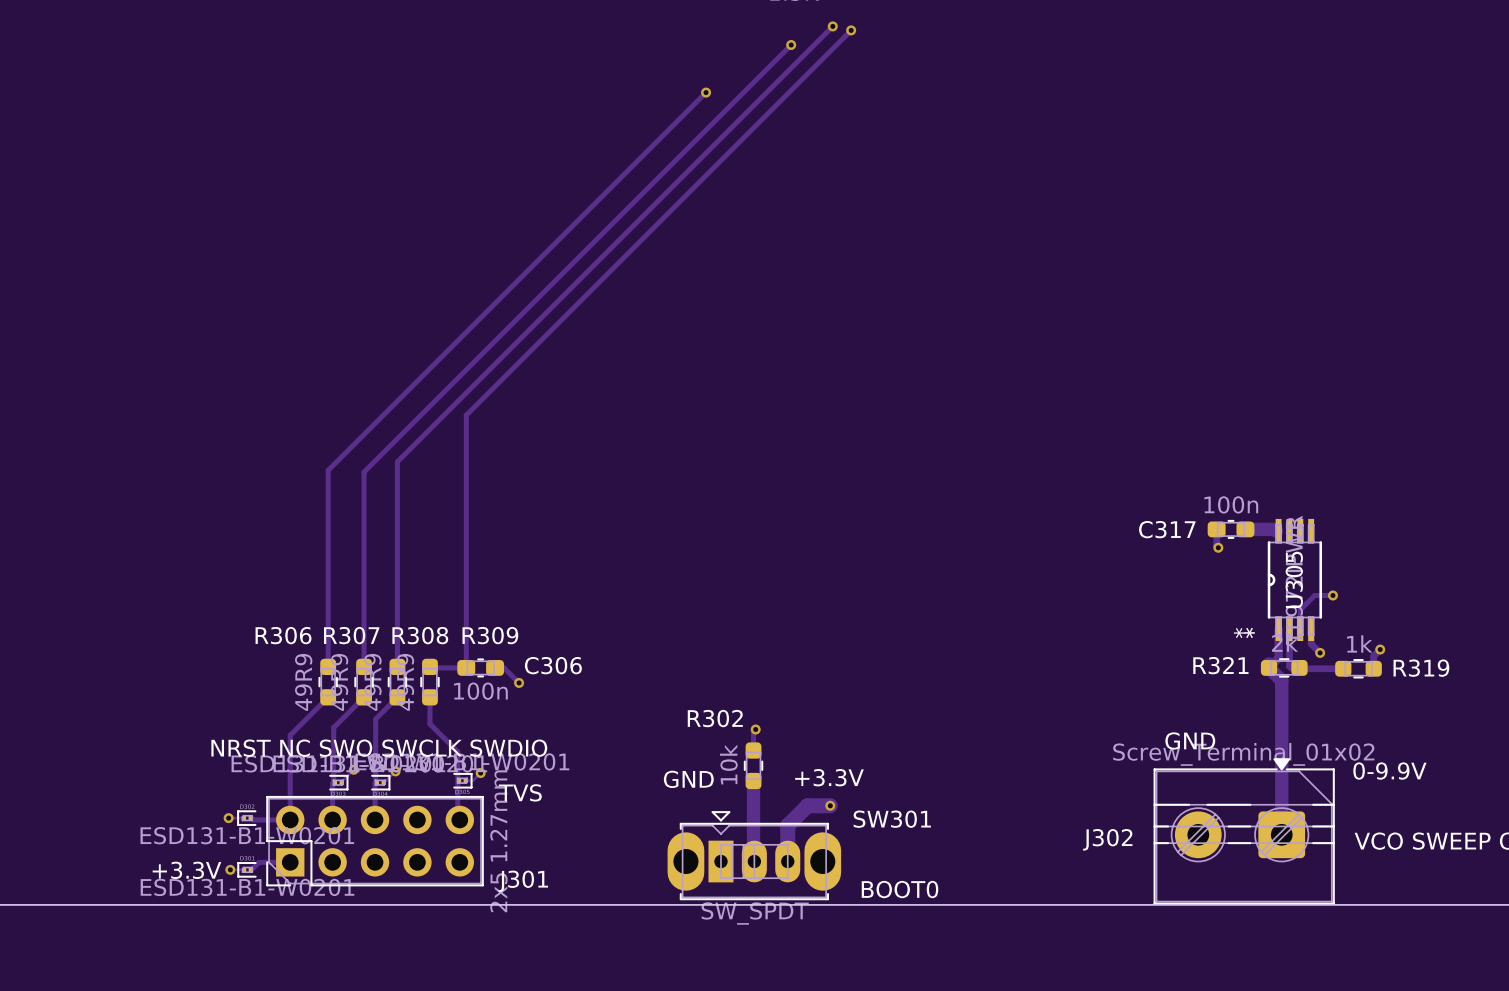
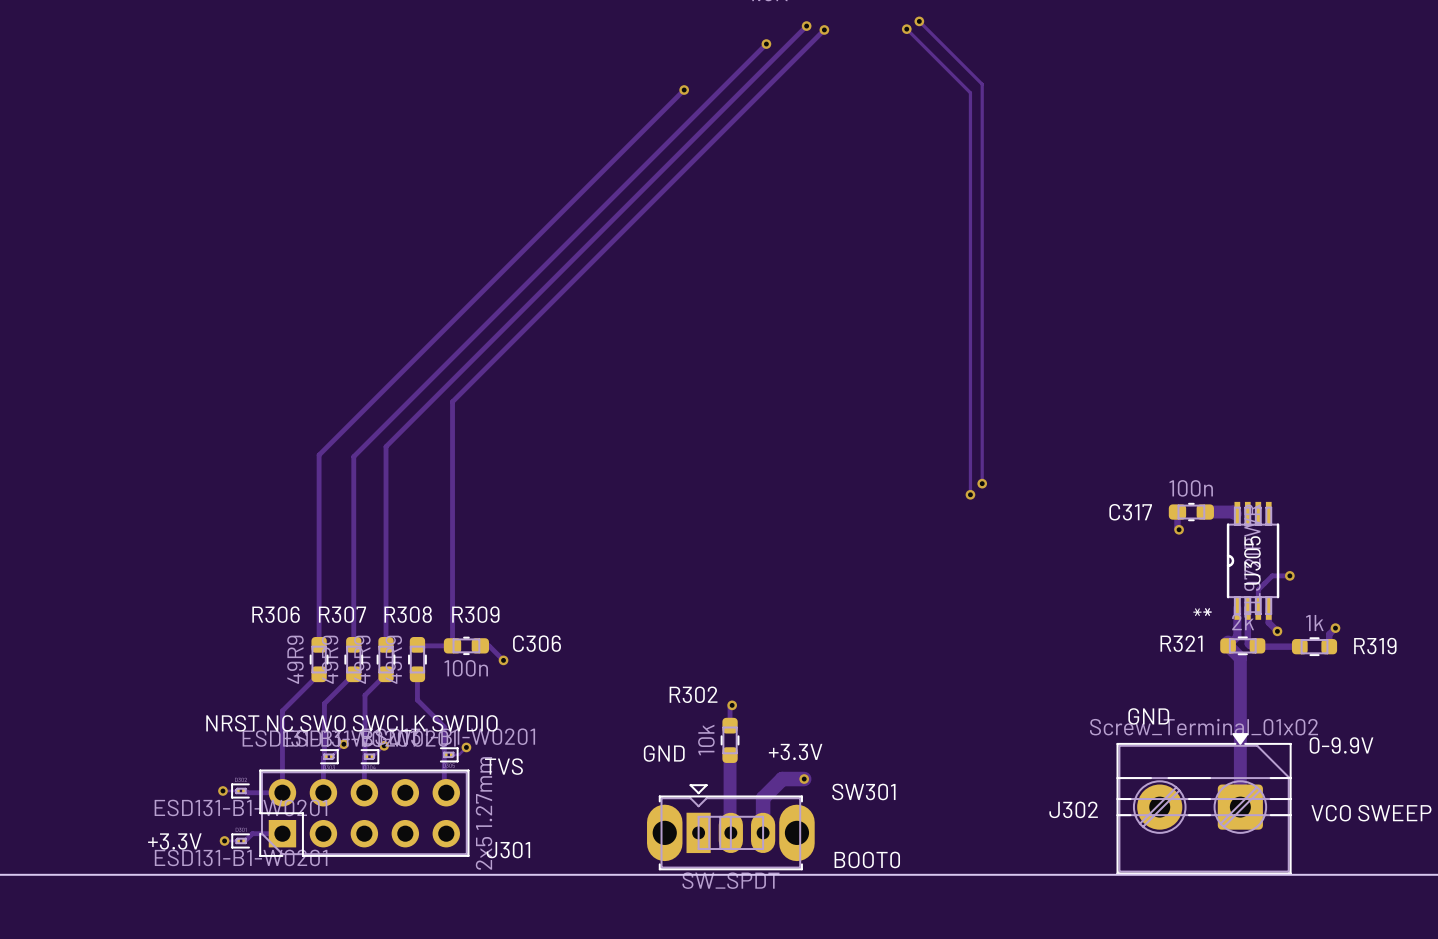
track: none -> (919, 21) (982, 84) (982, 483)
via: none -> (919, 21)
track: none -> (906, 29) (970, 92) (970, 494)
via: none -> (906, 29)
via: none -> (982, 483)
via: none -> (970, 494)

